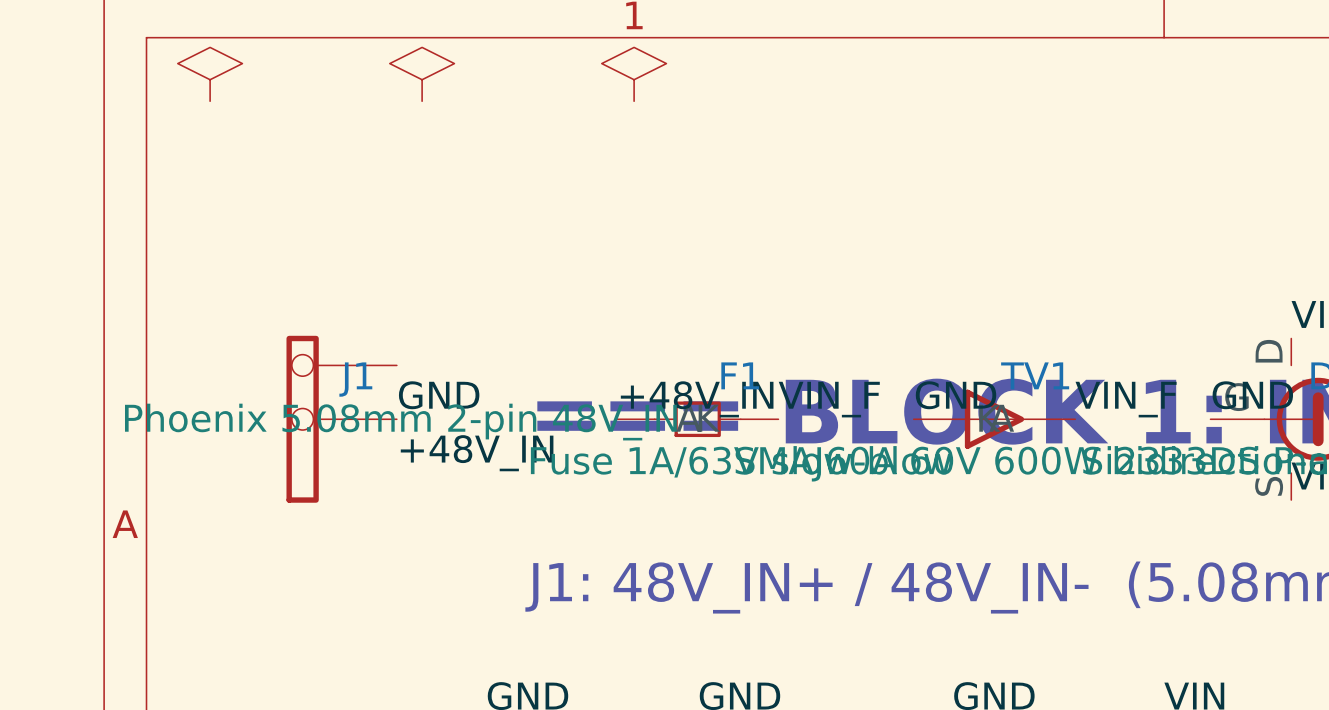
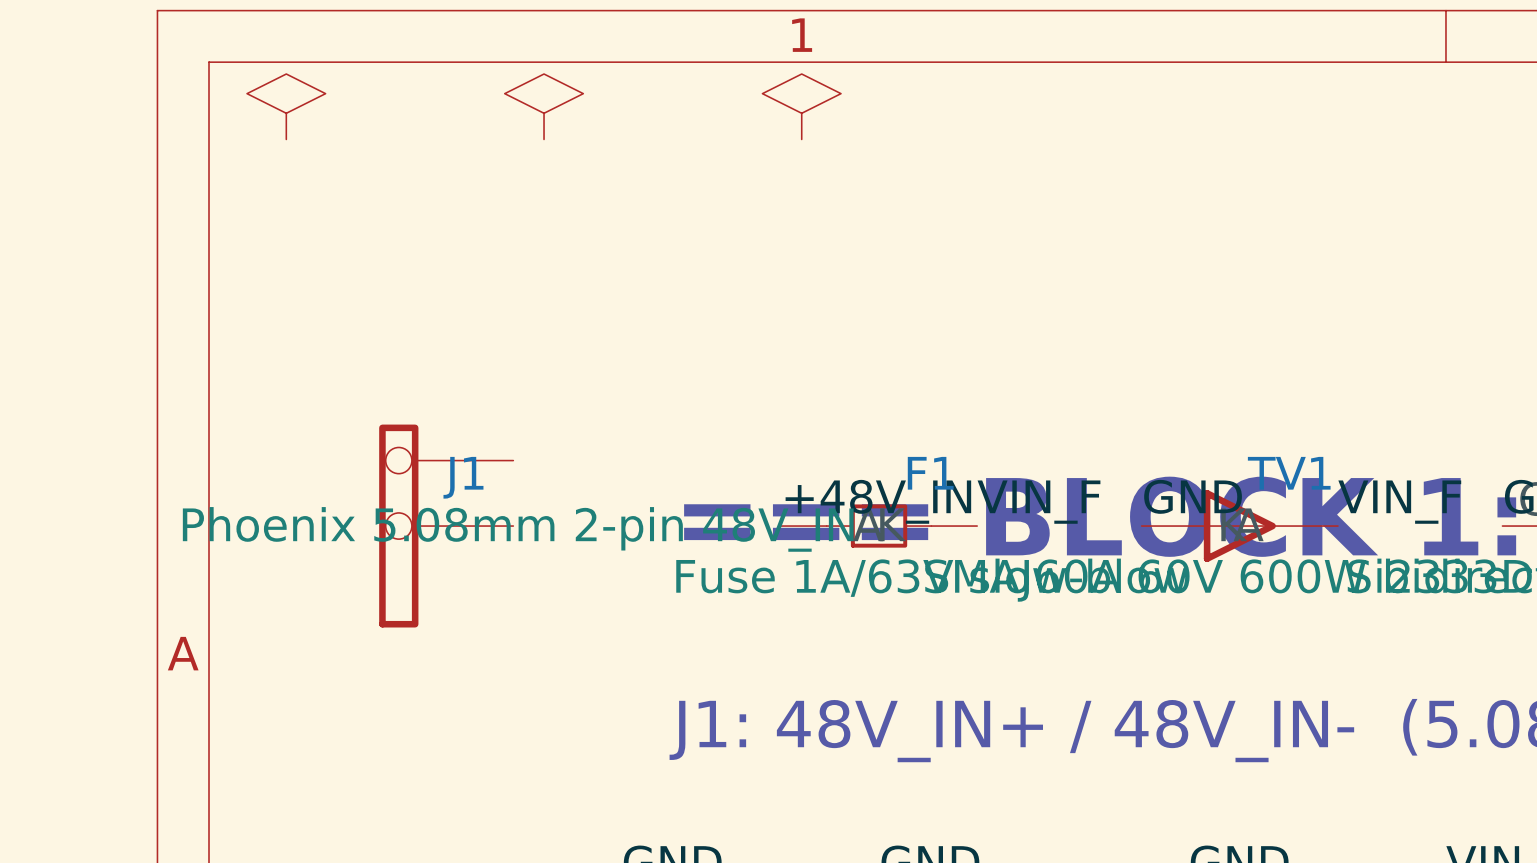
label: GND (439, 395) -> none
label: +48V_IN (477, 453) -> none

